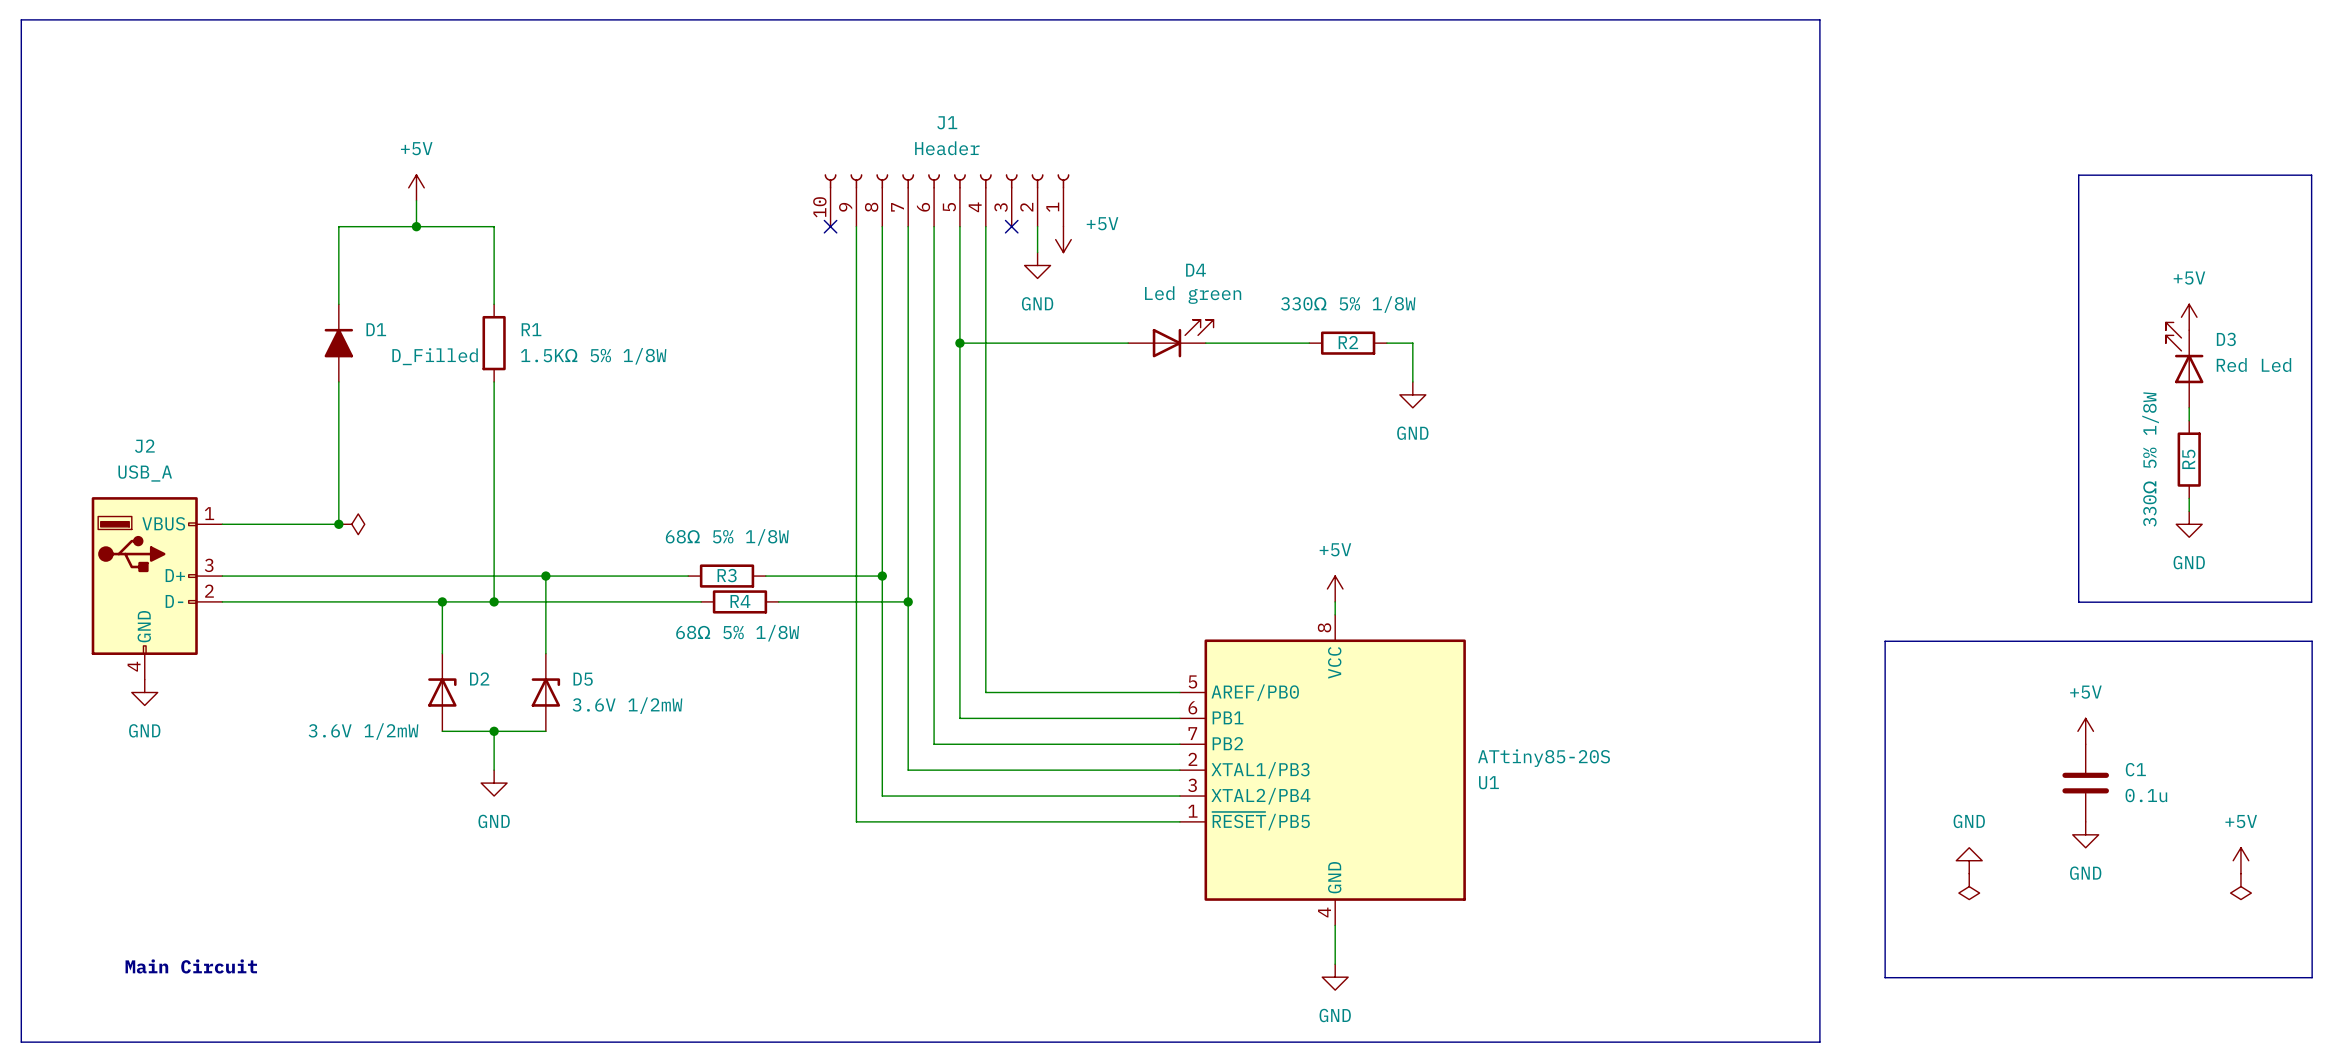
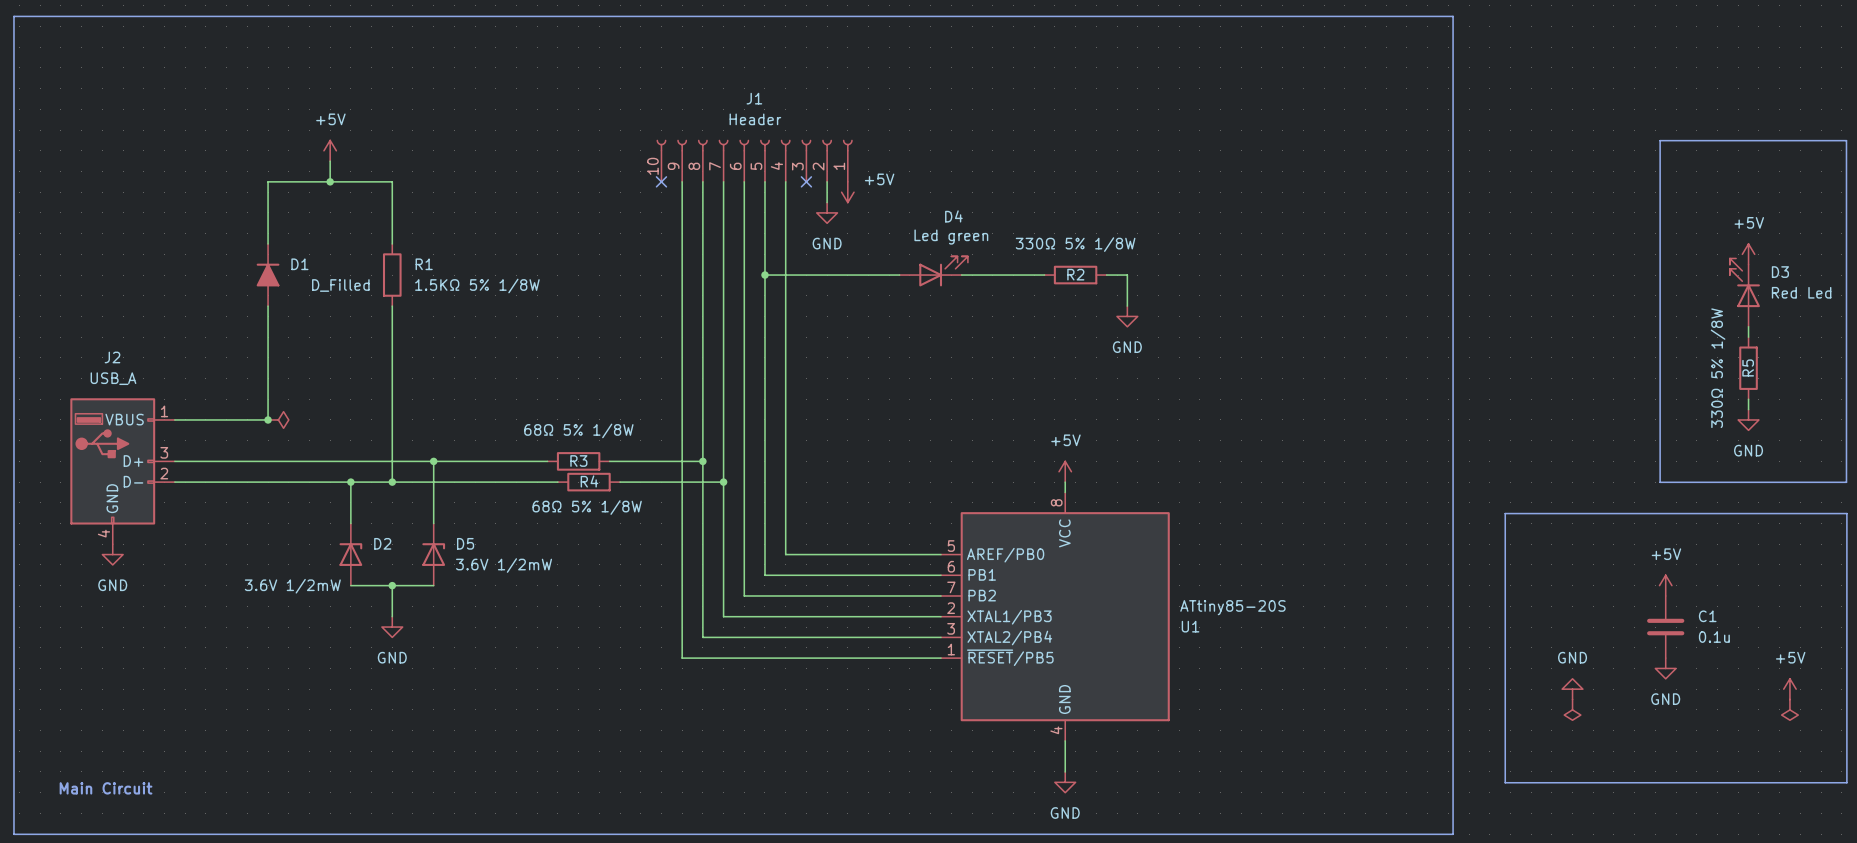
text position: Main Circuit (191, 966) -> Main Circuit (106, 788)

